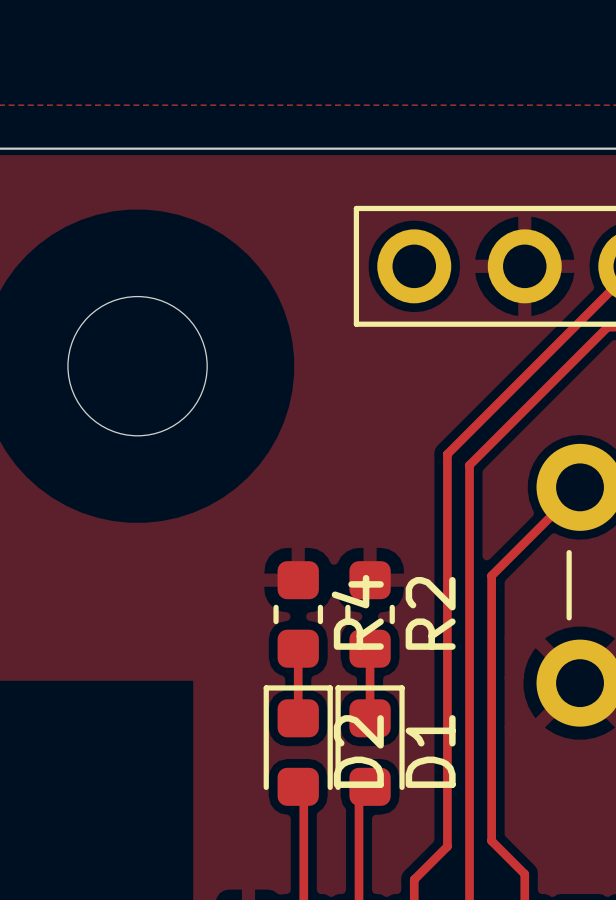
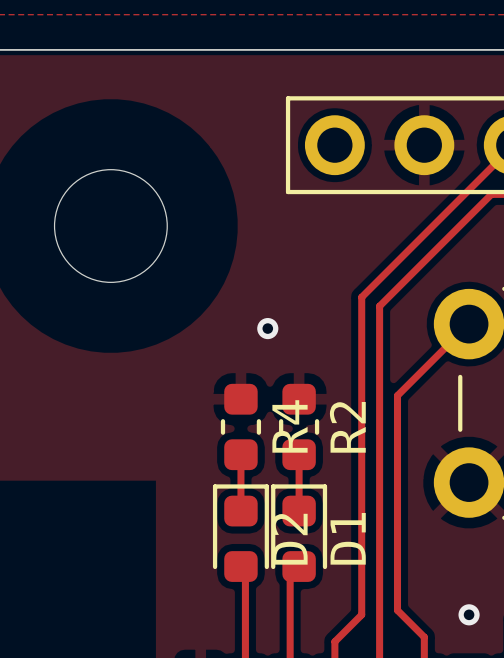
via: none -> (267, 328)
via: none -> (469, 614)

